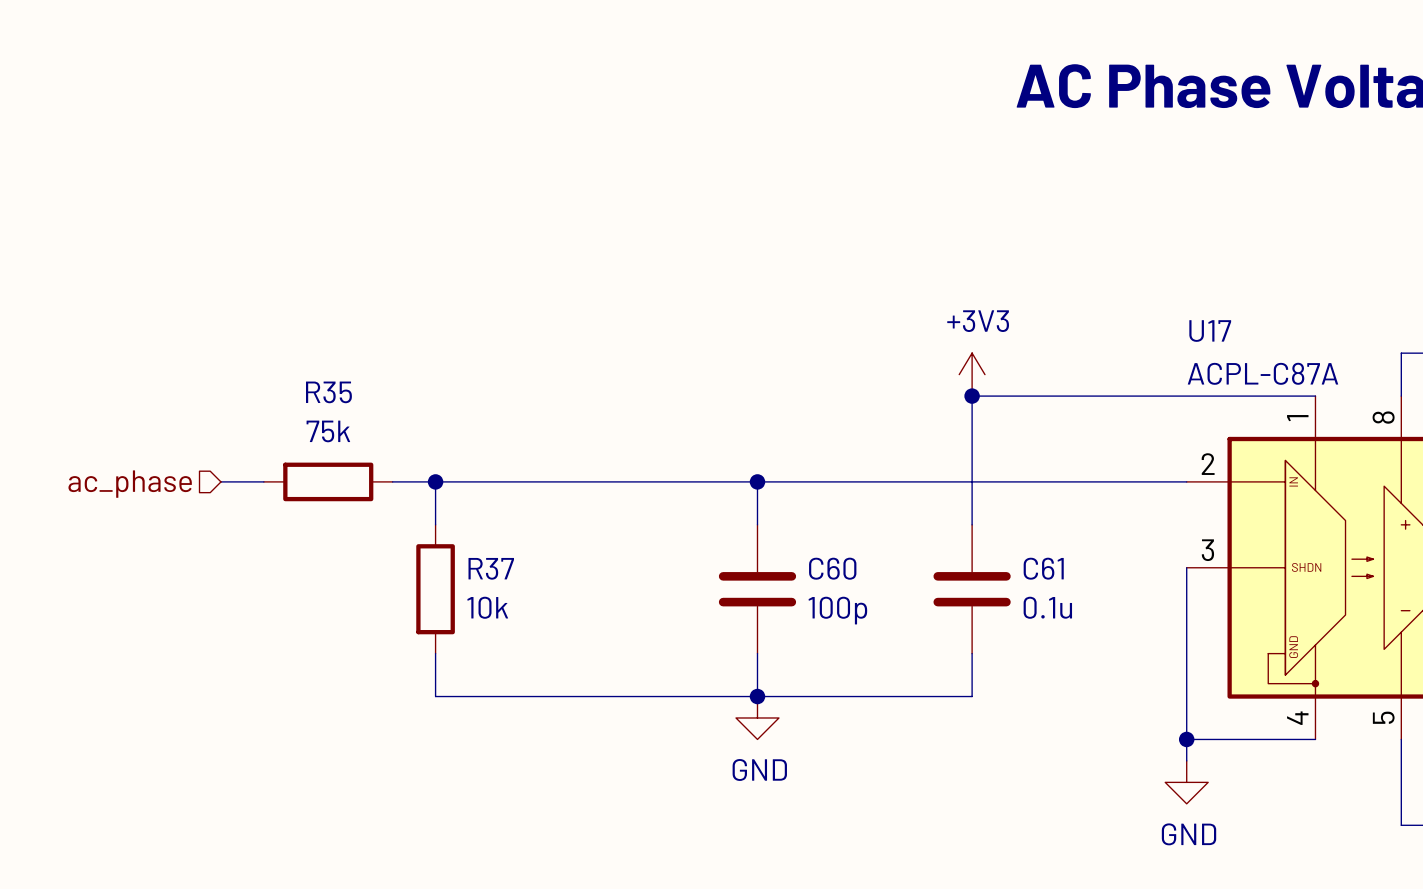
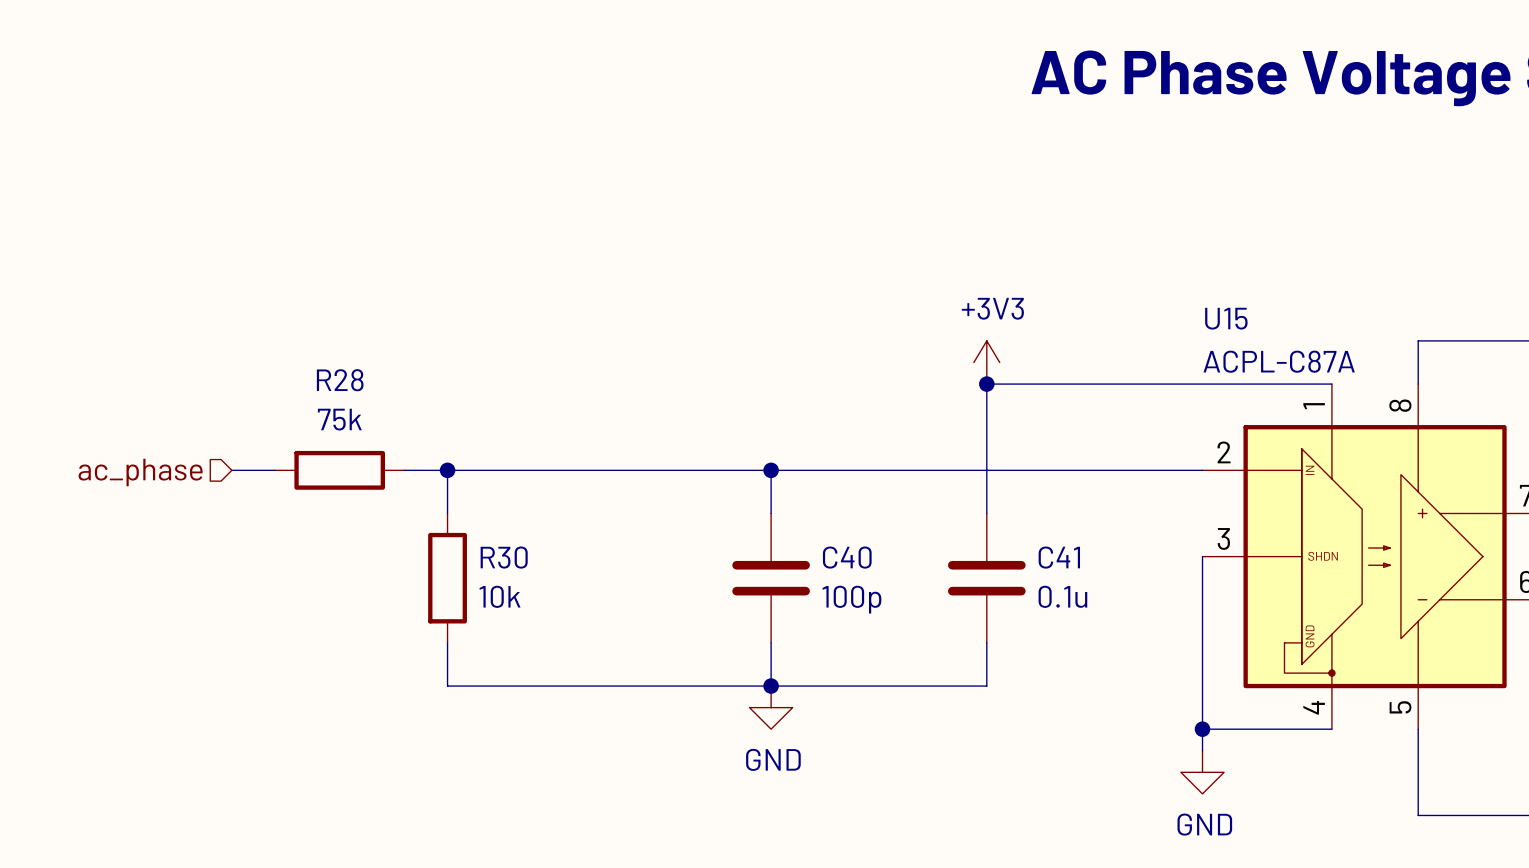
U17 name: U17 (1210, 331) -> U15 (1226, 318)
R35 name: R35 (328, 392) -> R28 (340, 380)
R37 name: R37 (491, 568) -> R30 (504, 557)
C60 name: C60 (832, 568) -> C40 (847, 557)
C61 name: C61 (1043, 568) -> C41 (1059, 557)

